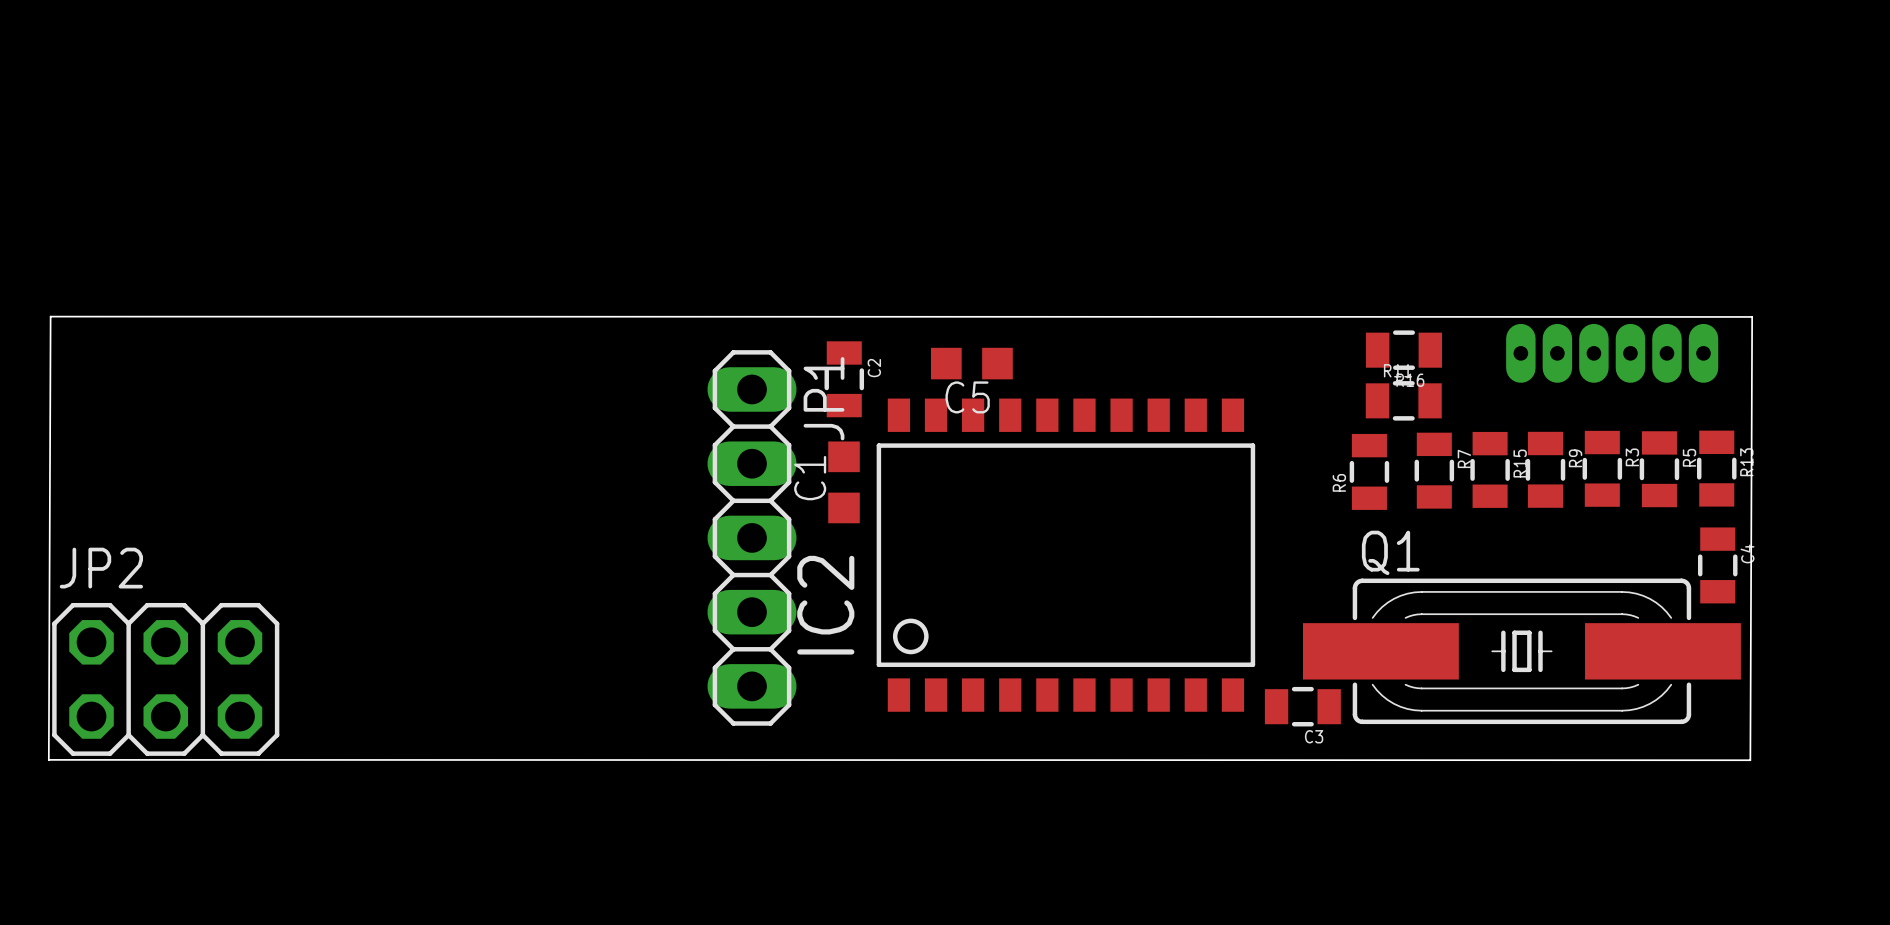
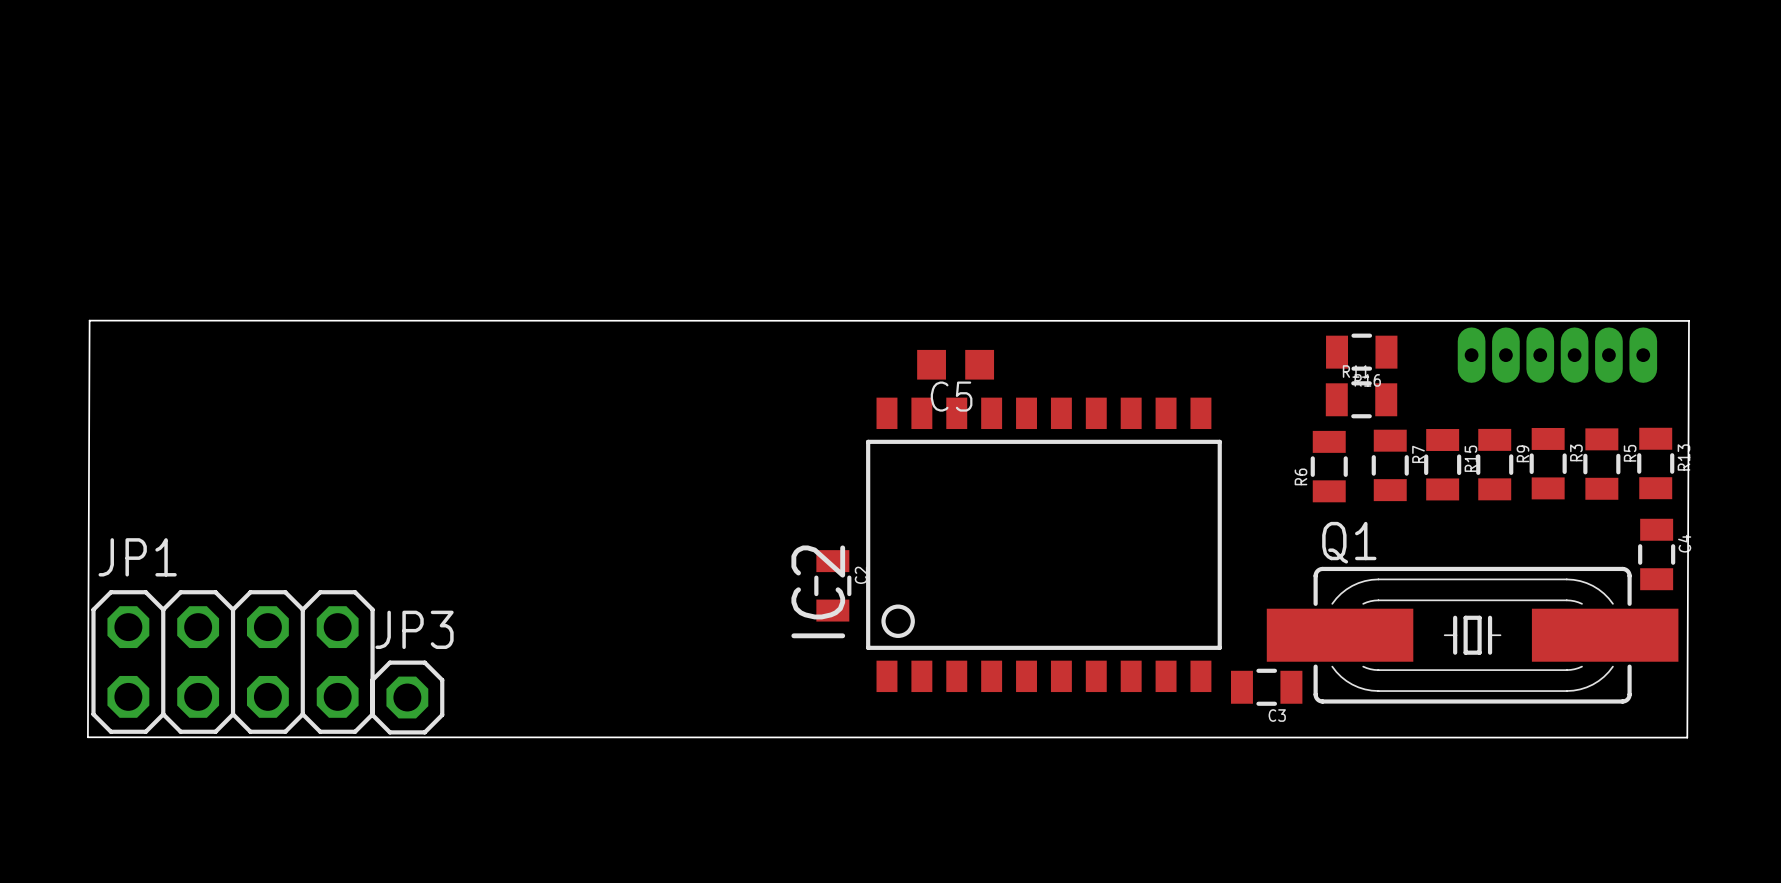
JP1 footprint: [707, 350, 797, 726] -> [91, 590, 375, 734]
C2 position: (844, 379) -> (832, 585)
JP1 name position: JP1 (824, 398) -> JP1 (137, 557)
C1: (844, 482) -> none
JP2: (165, 679) -> none
JP3: none -> (407, 697)

